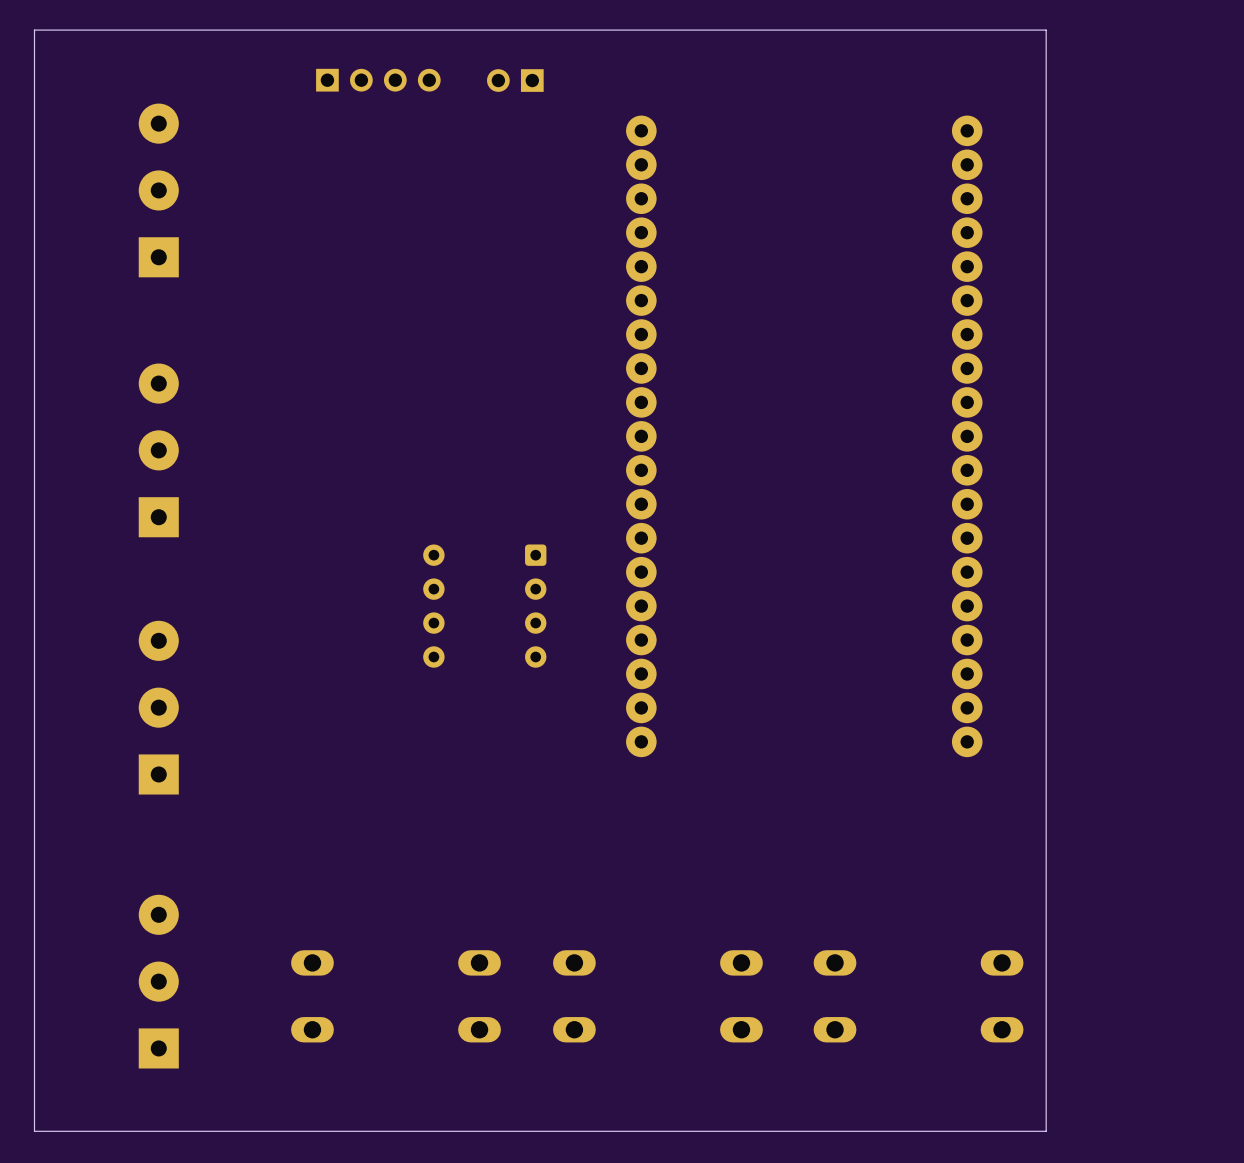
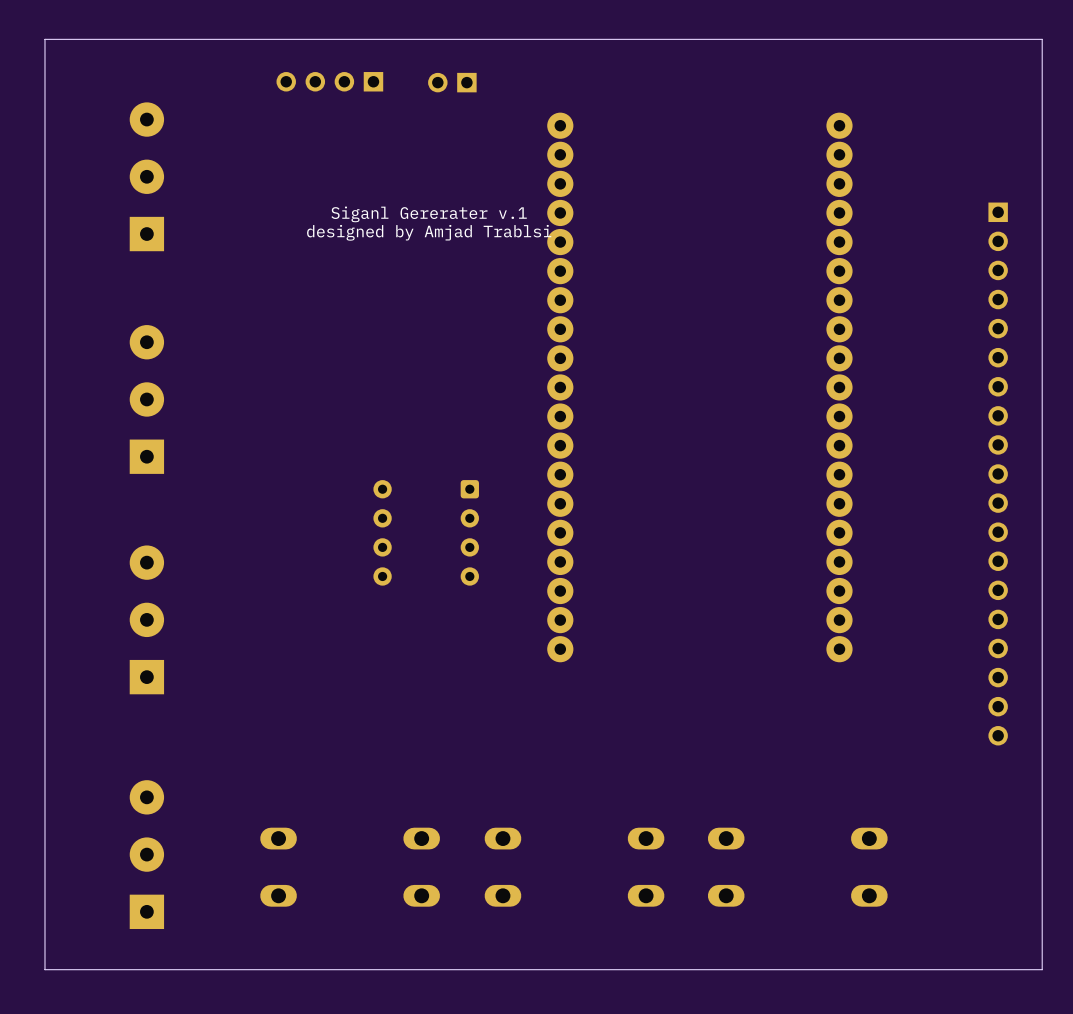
board edge: (1046, 30) (1046, 1131) (34, 1131) (34, 30) (39, 30) -> (907, 39) (1042, 39) (1042, 969) (44, 969) (44, 39)
part rotation: 0° (378, 80) -> 180° (329, 81)
text: none -> Siganl Gererater v.1 (429, 214)
text: none -> designed by Amjad Trablsi (429, 232)
part: none -> (998, 474)

